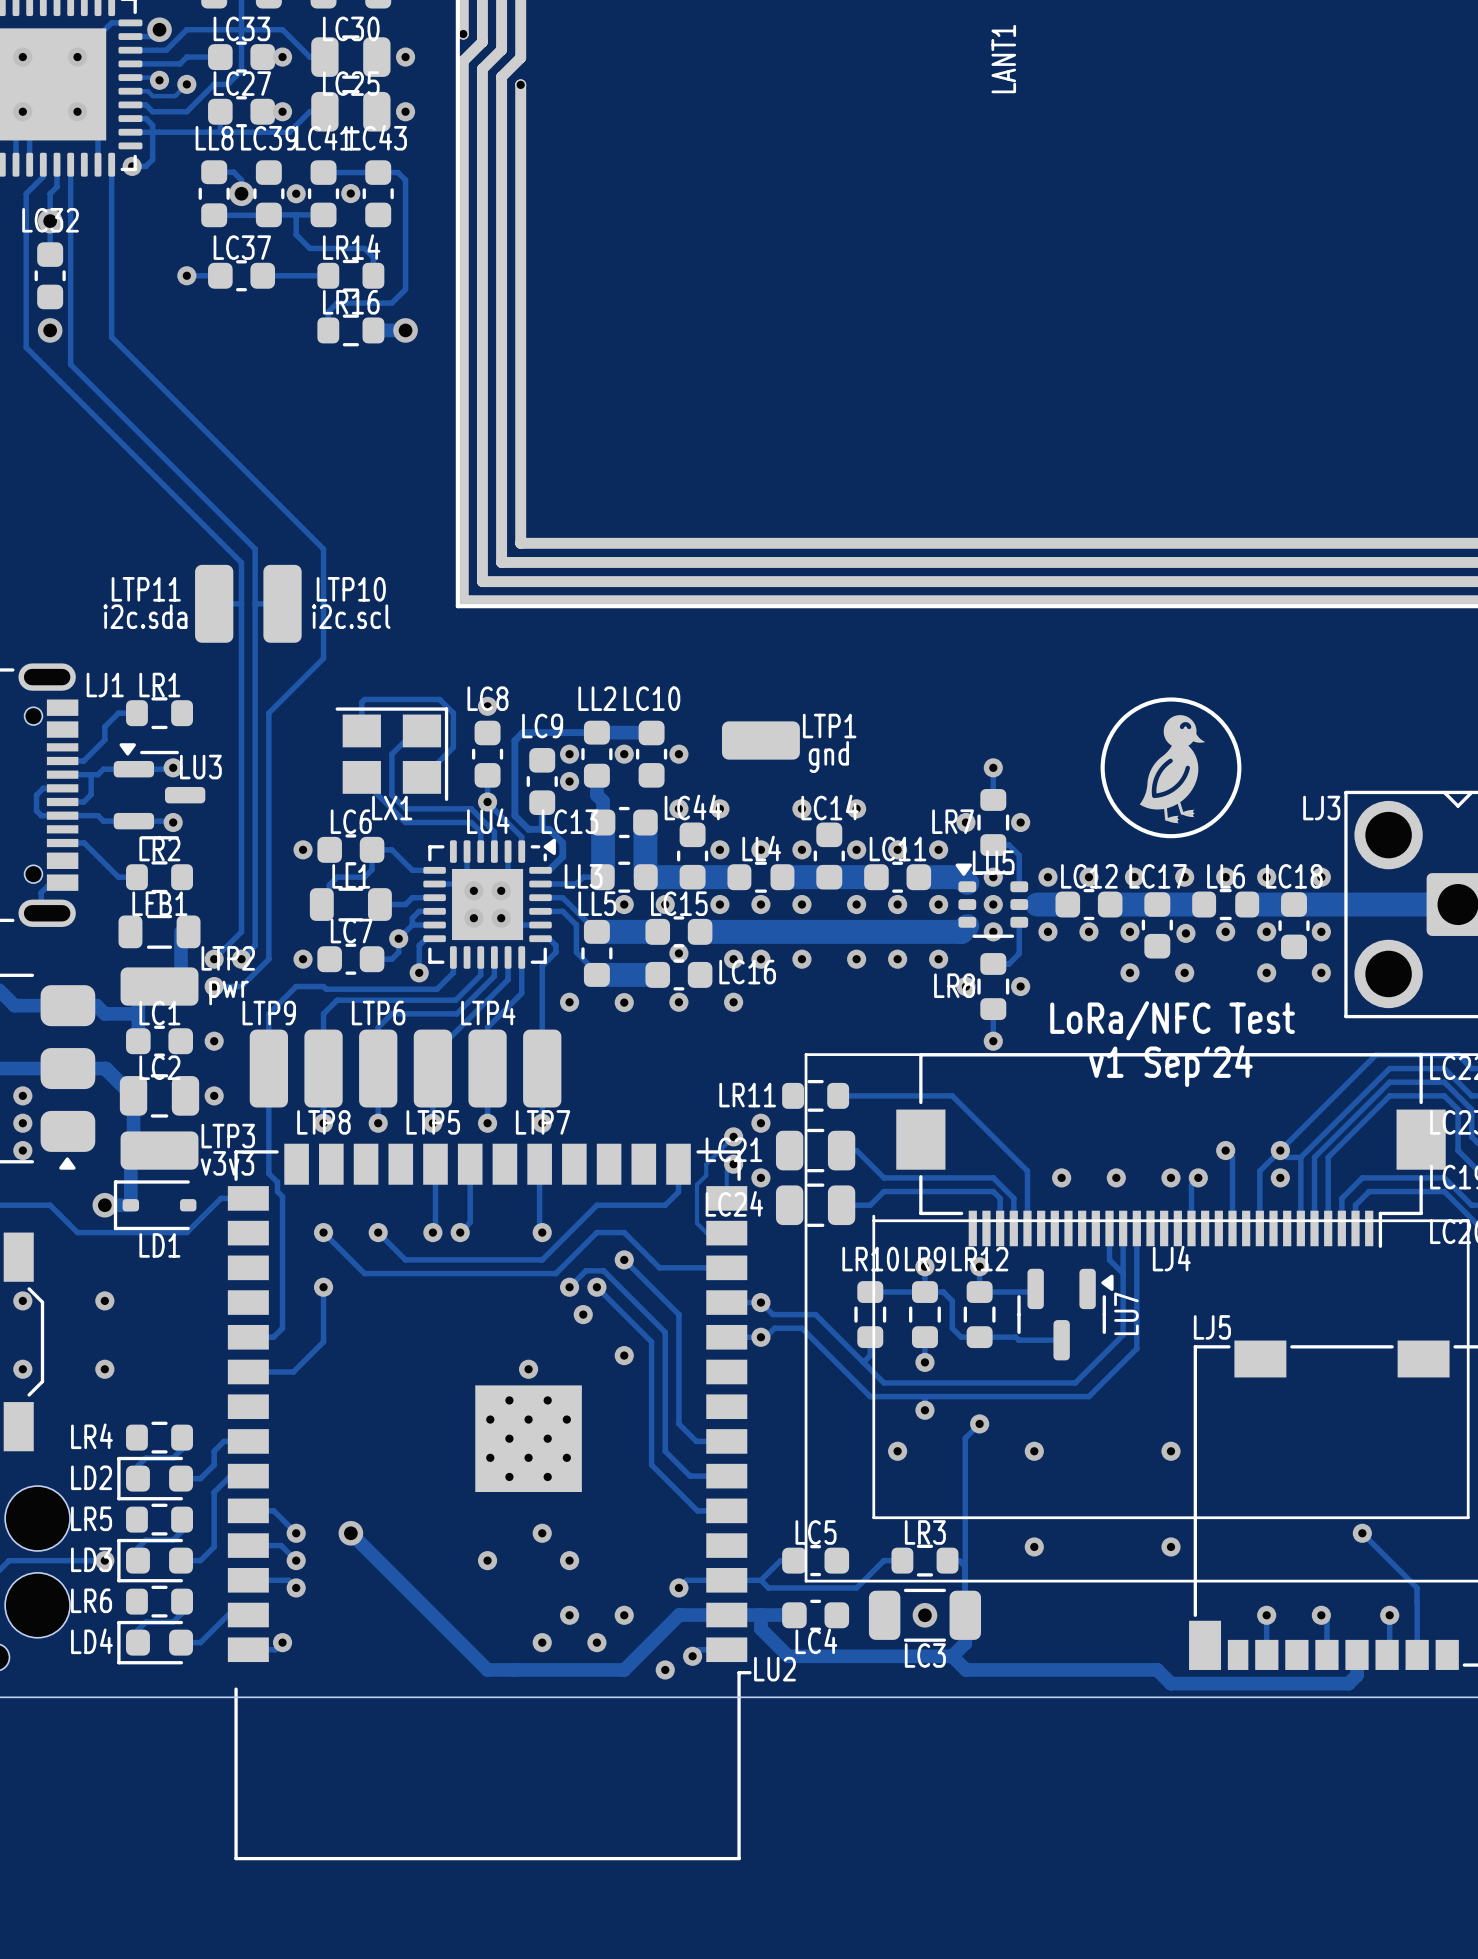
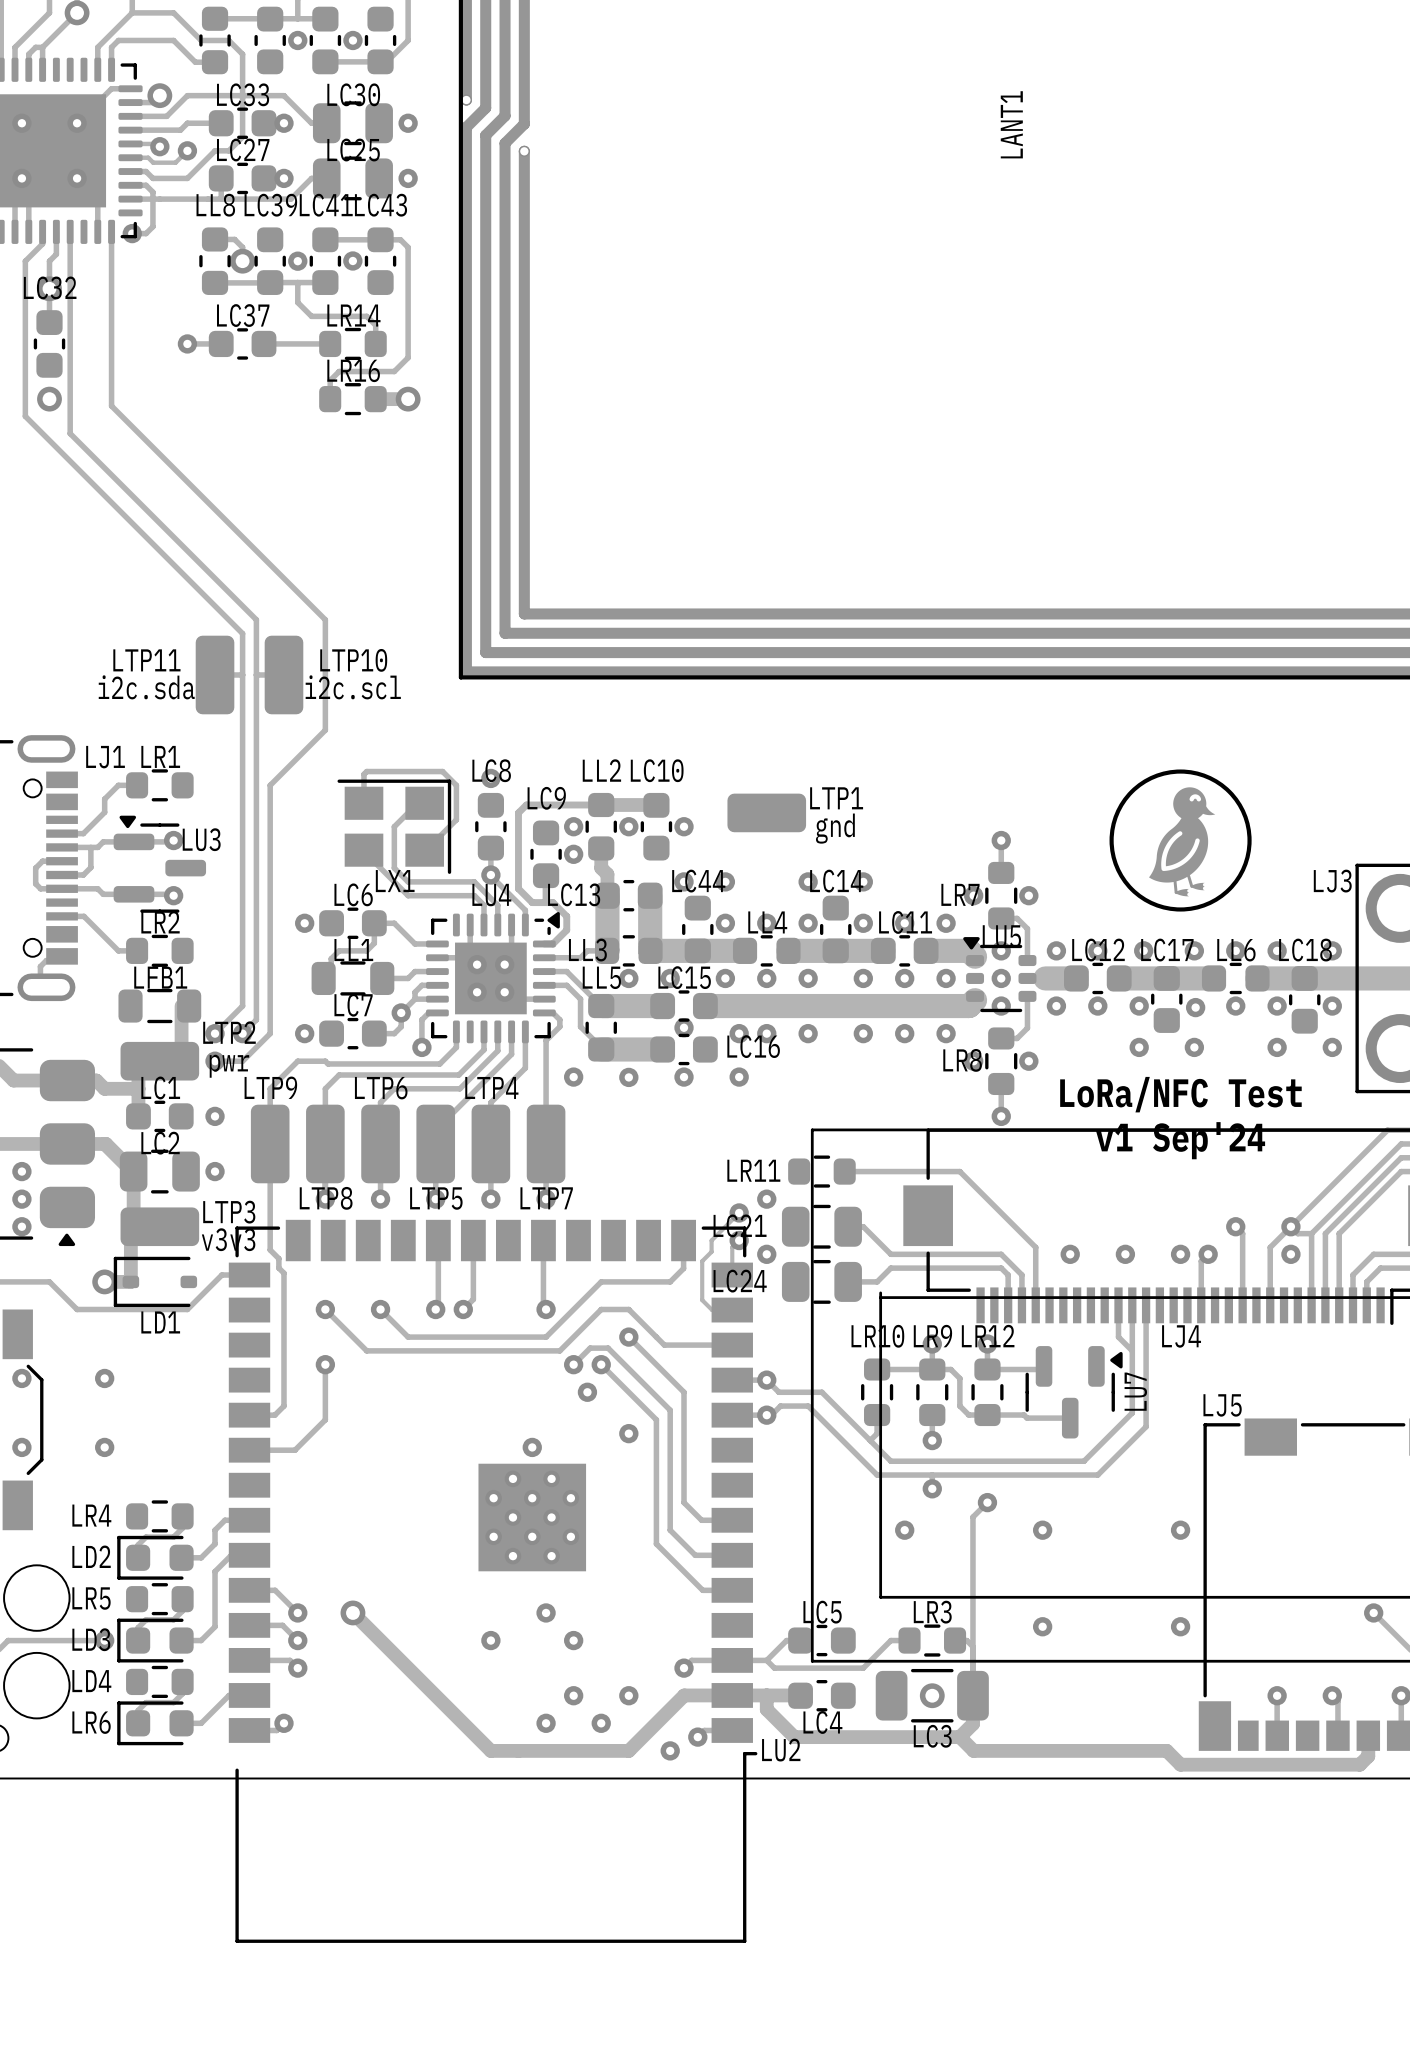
LR6 name position: LR6 (91, 1600) -> LR6 (91, 1722)
LD4 name position: LD4 (91, 1641) -> LD4 (91, 1681)

